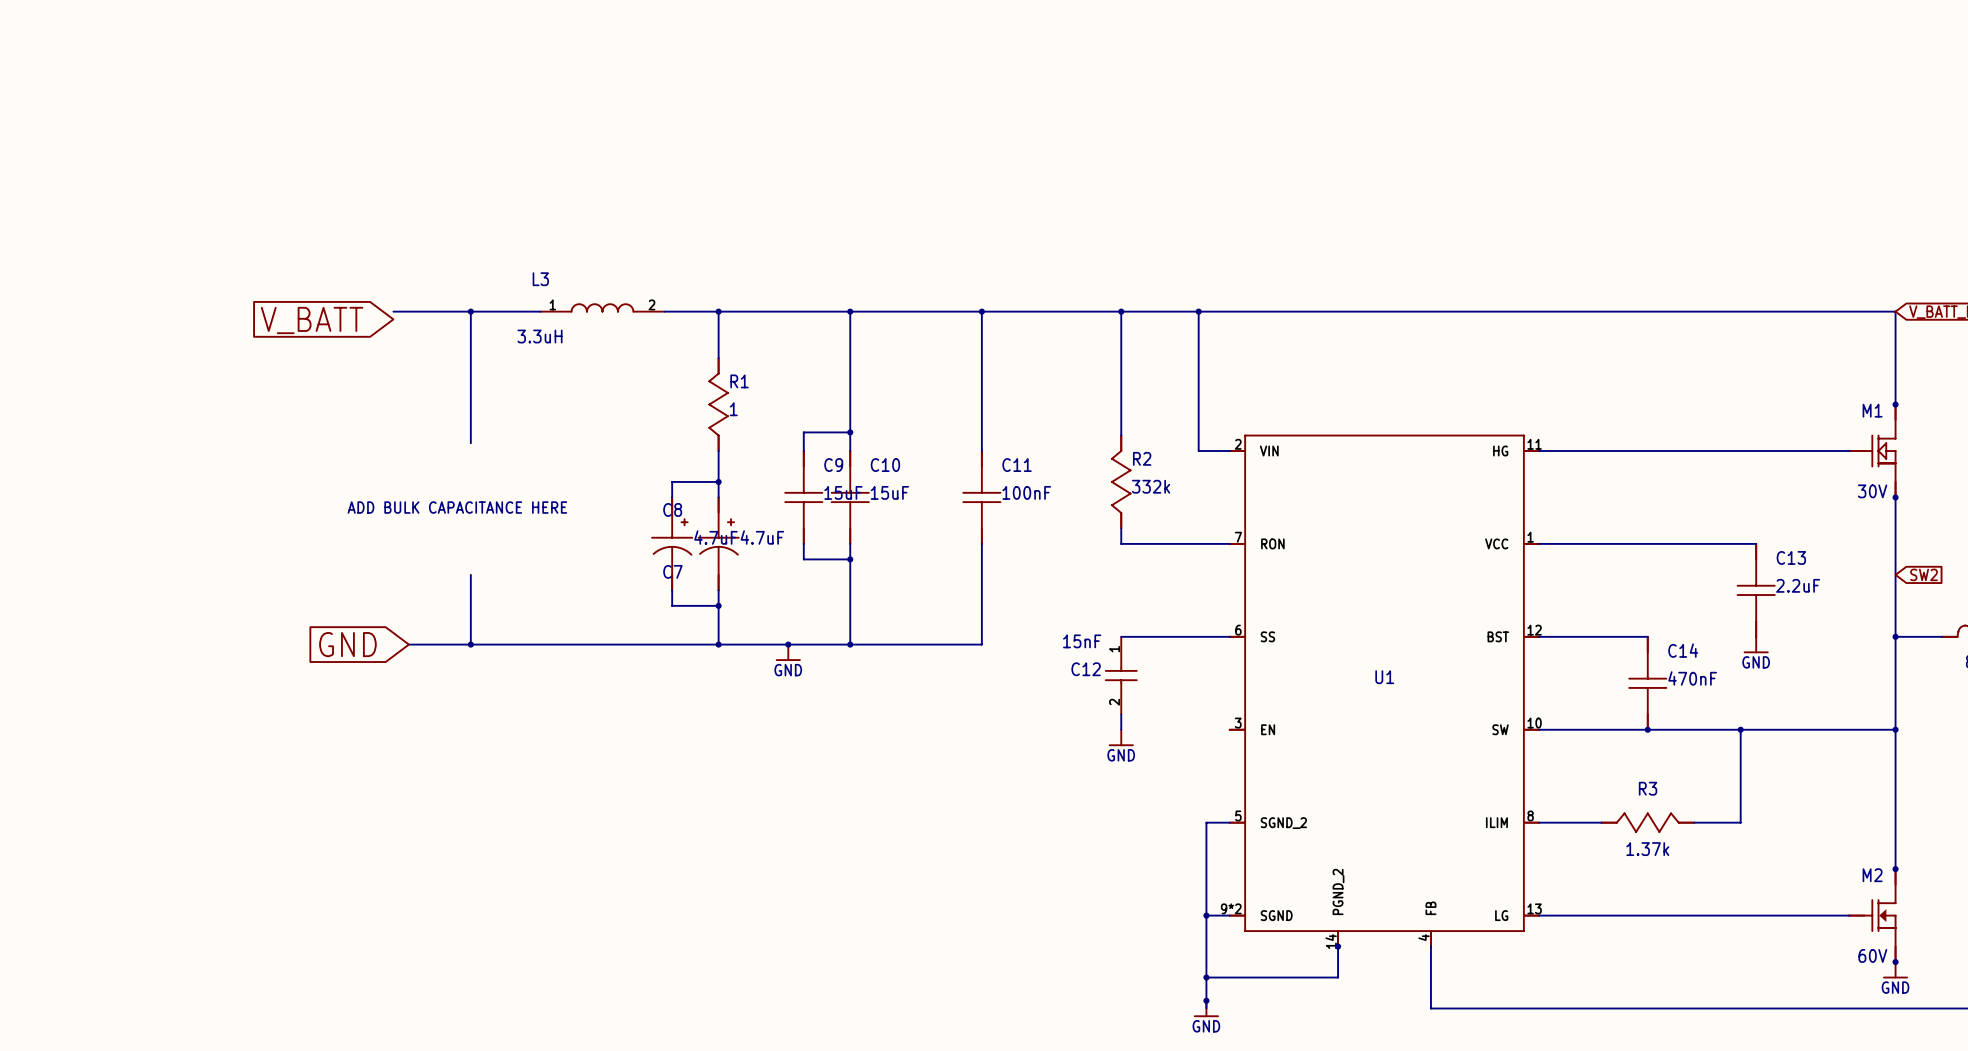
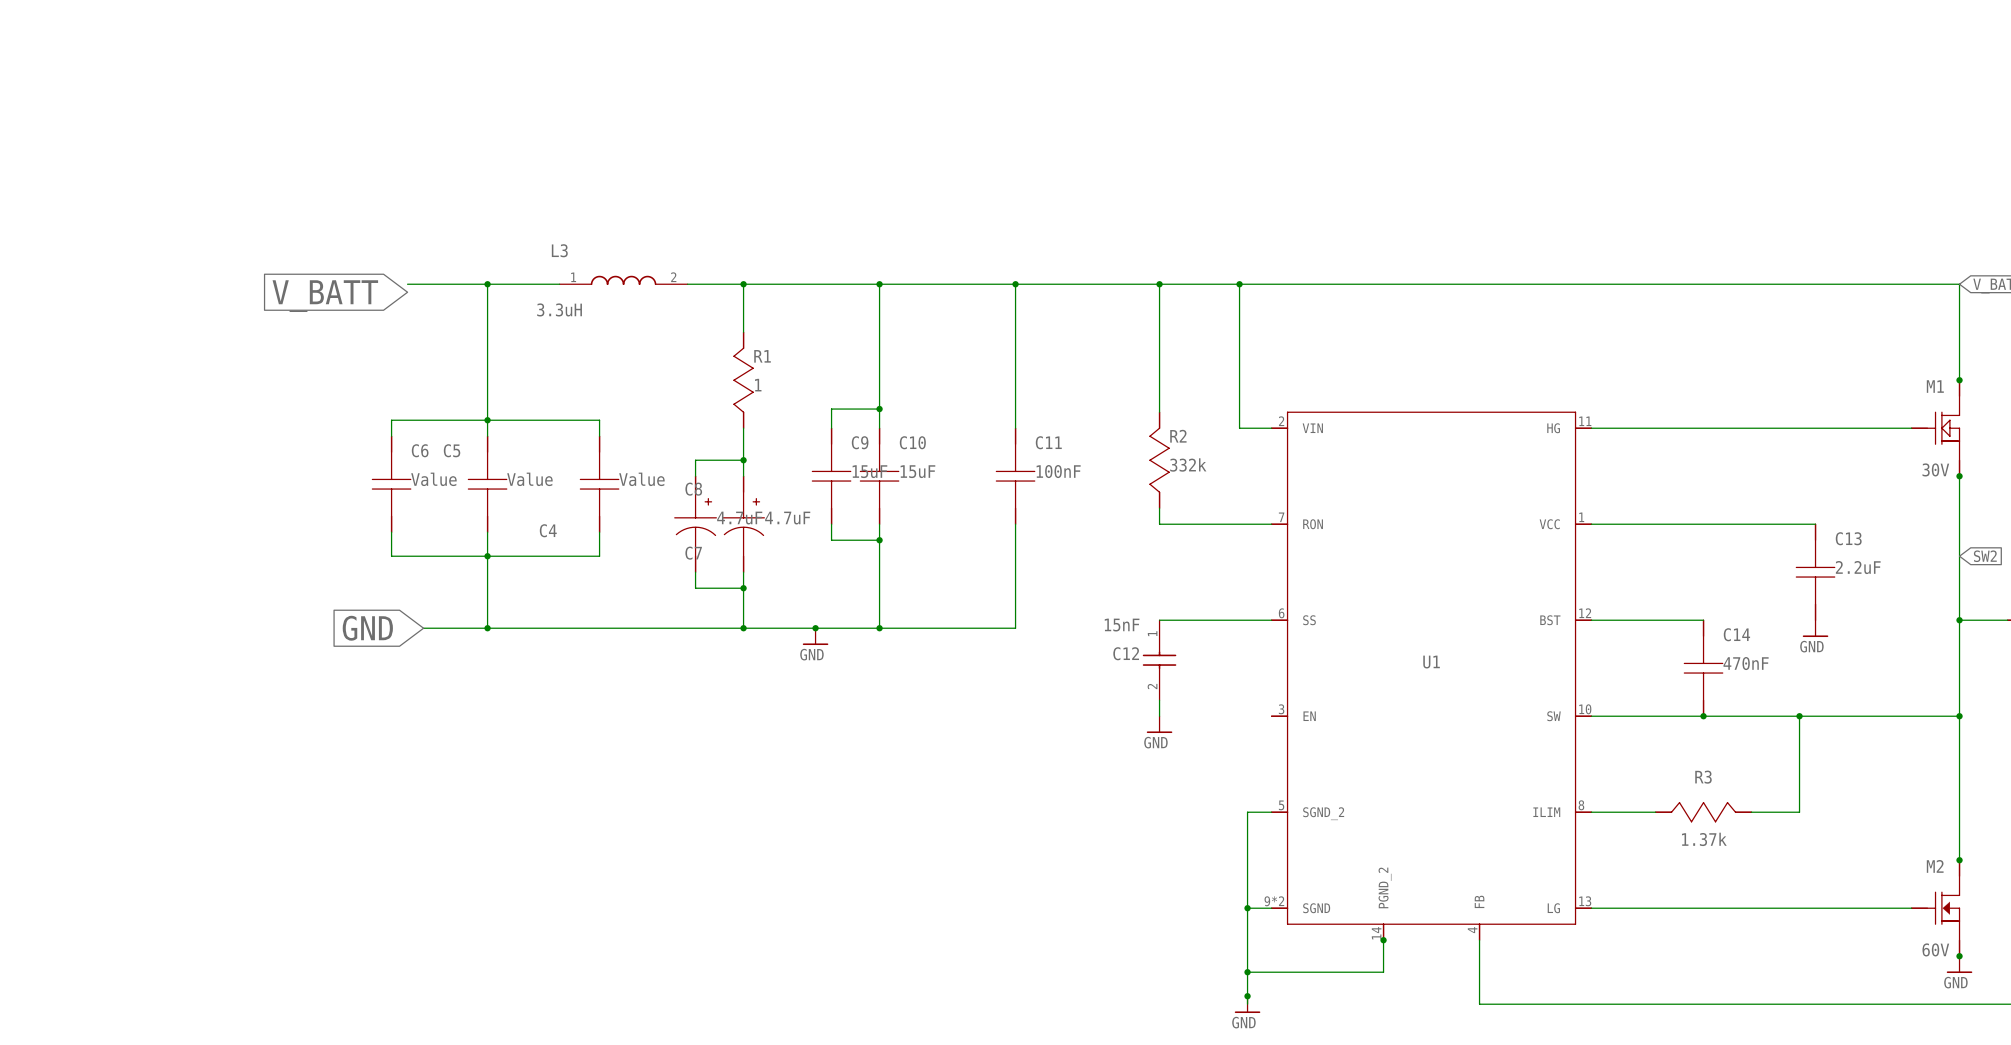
wire: none -> (487, 420) (487, 436)
junction: none -> (487, 420)
wire: none -> (391, 436) (391, 420) (599, 420) (599, 436)
C6: none -> Value (391, 484)
C5: none -> Value (487, 484)
C4: none -> Value (599, 484)
text: ADD BULK CAPACITANCE HERE (457, 507) -> none
wire: none -> (391, 532) (391, 556) (599, 556) (599, 532)
wire: none -> (487, 532) (487, 556)
junction: none -> (487, 556)

